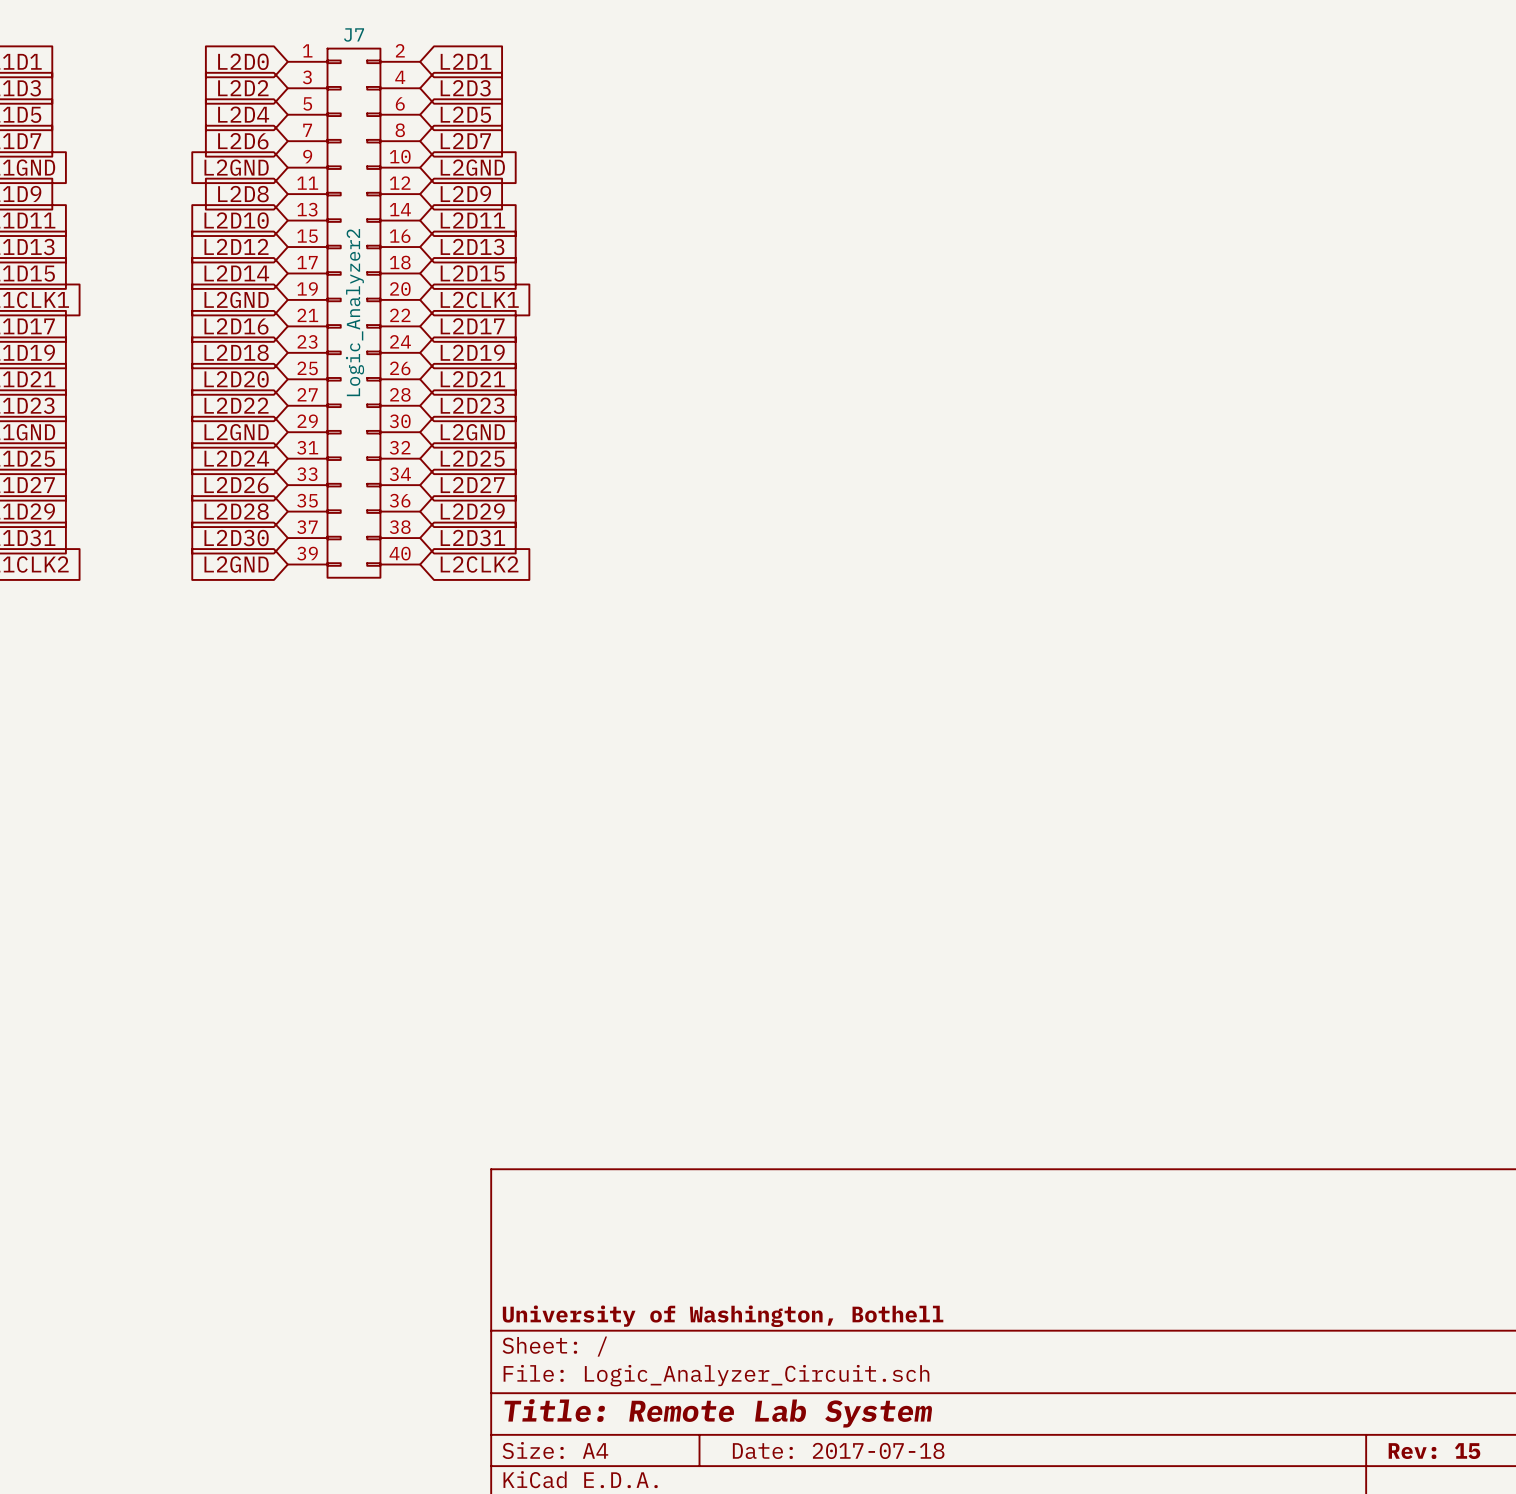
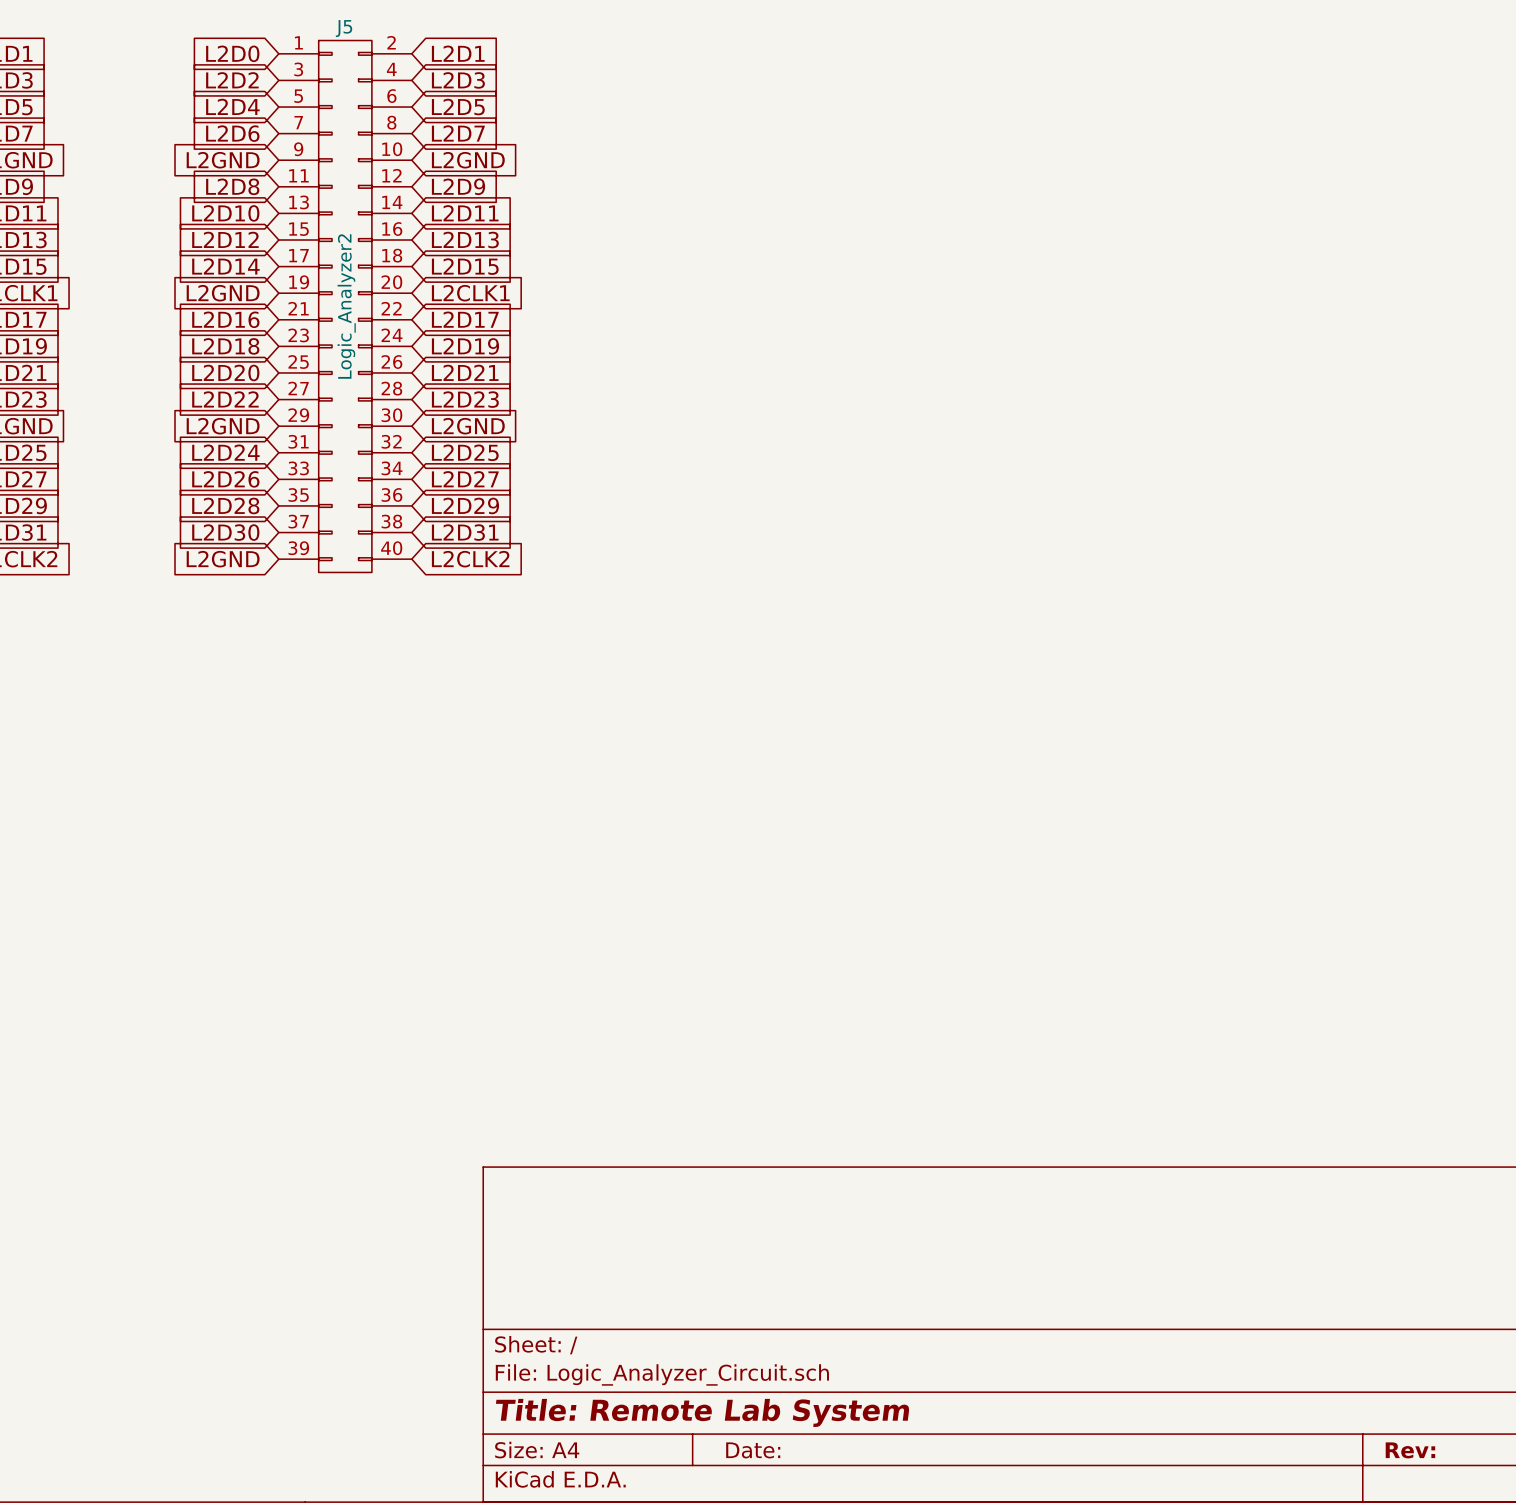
J7 name: J7 (354, 34) -> J5 (344, 28)
title block: University of Washington, Bothell (723, 1316) -> none
title block: Date: 2017-07-18 (838, 1450) -> Date: (753, 1450)
title block: Rev: 15 (1434, 1451) -> Rev: (1410, 1450)

